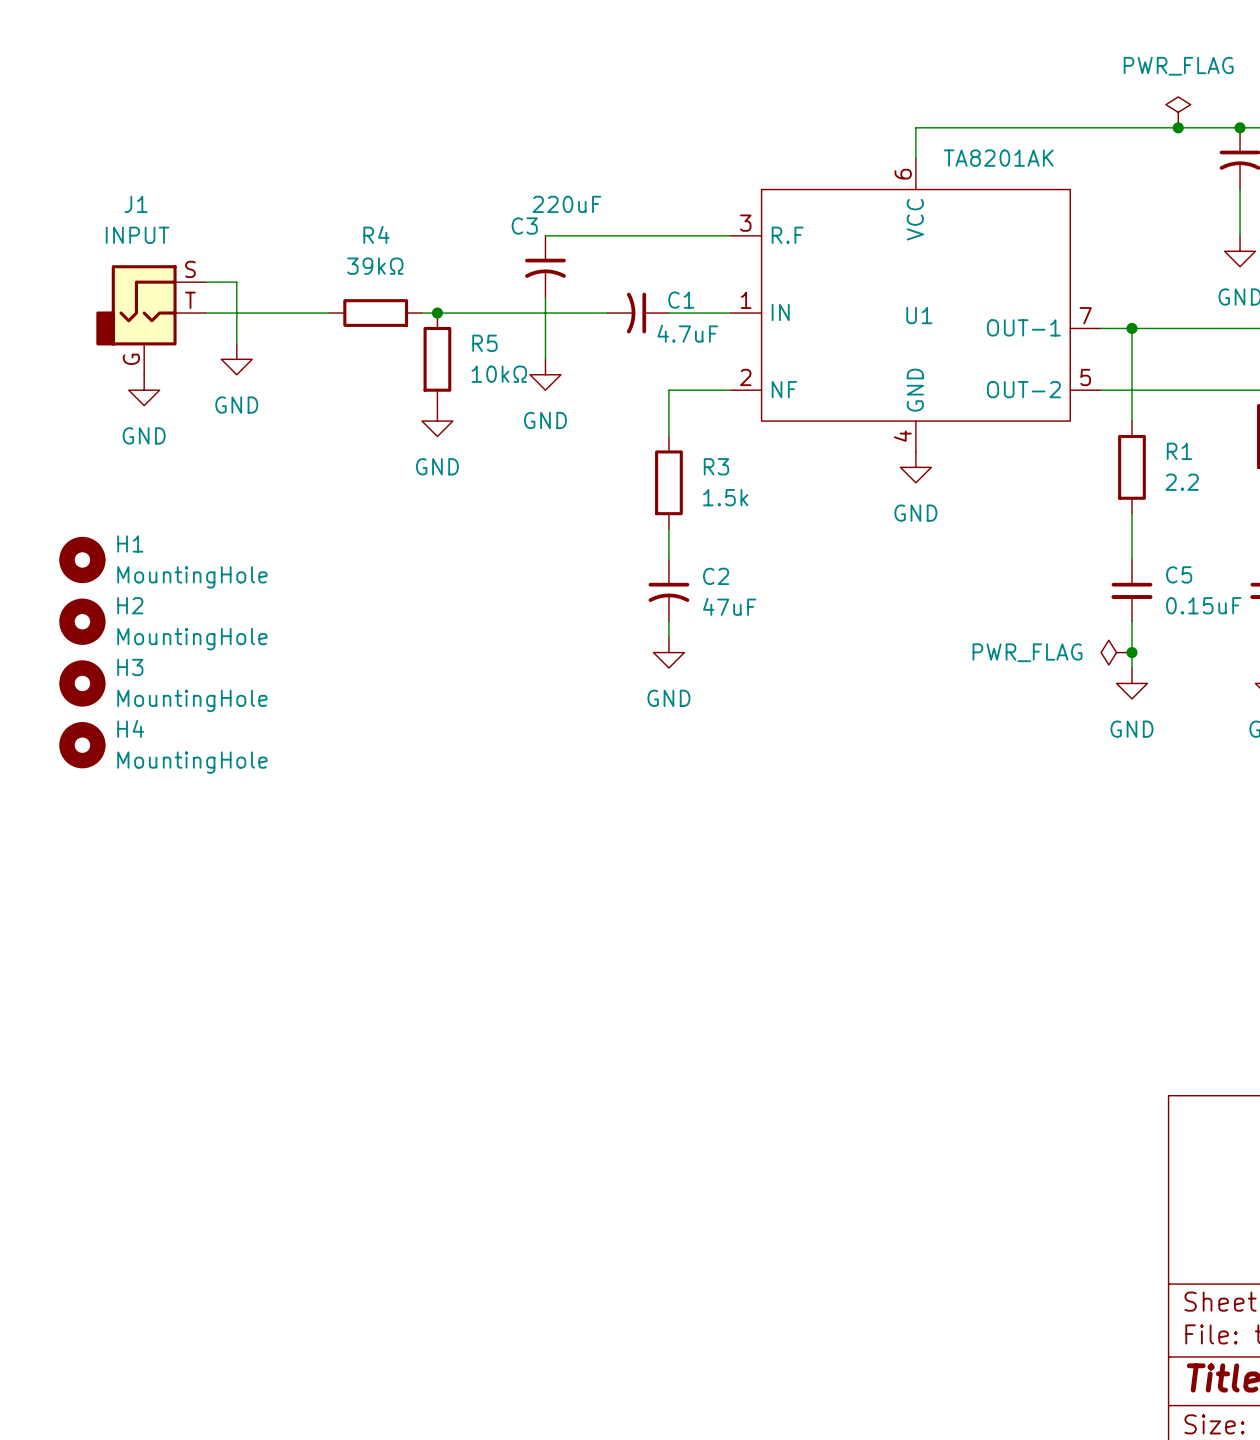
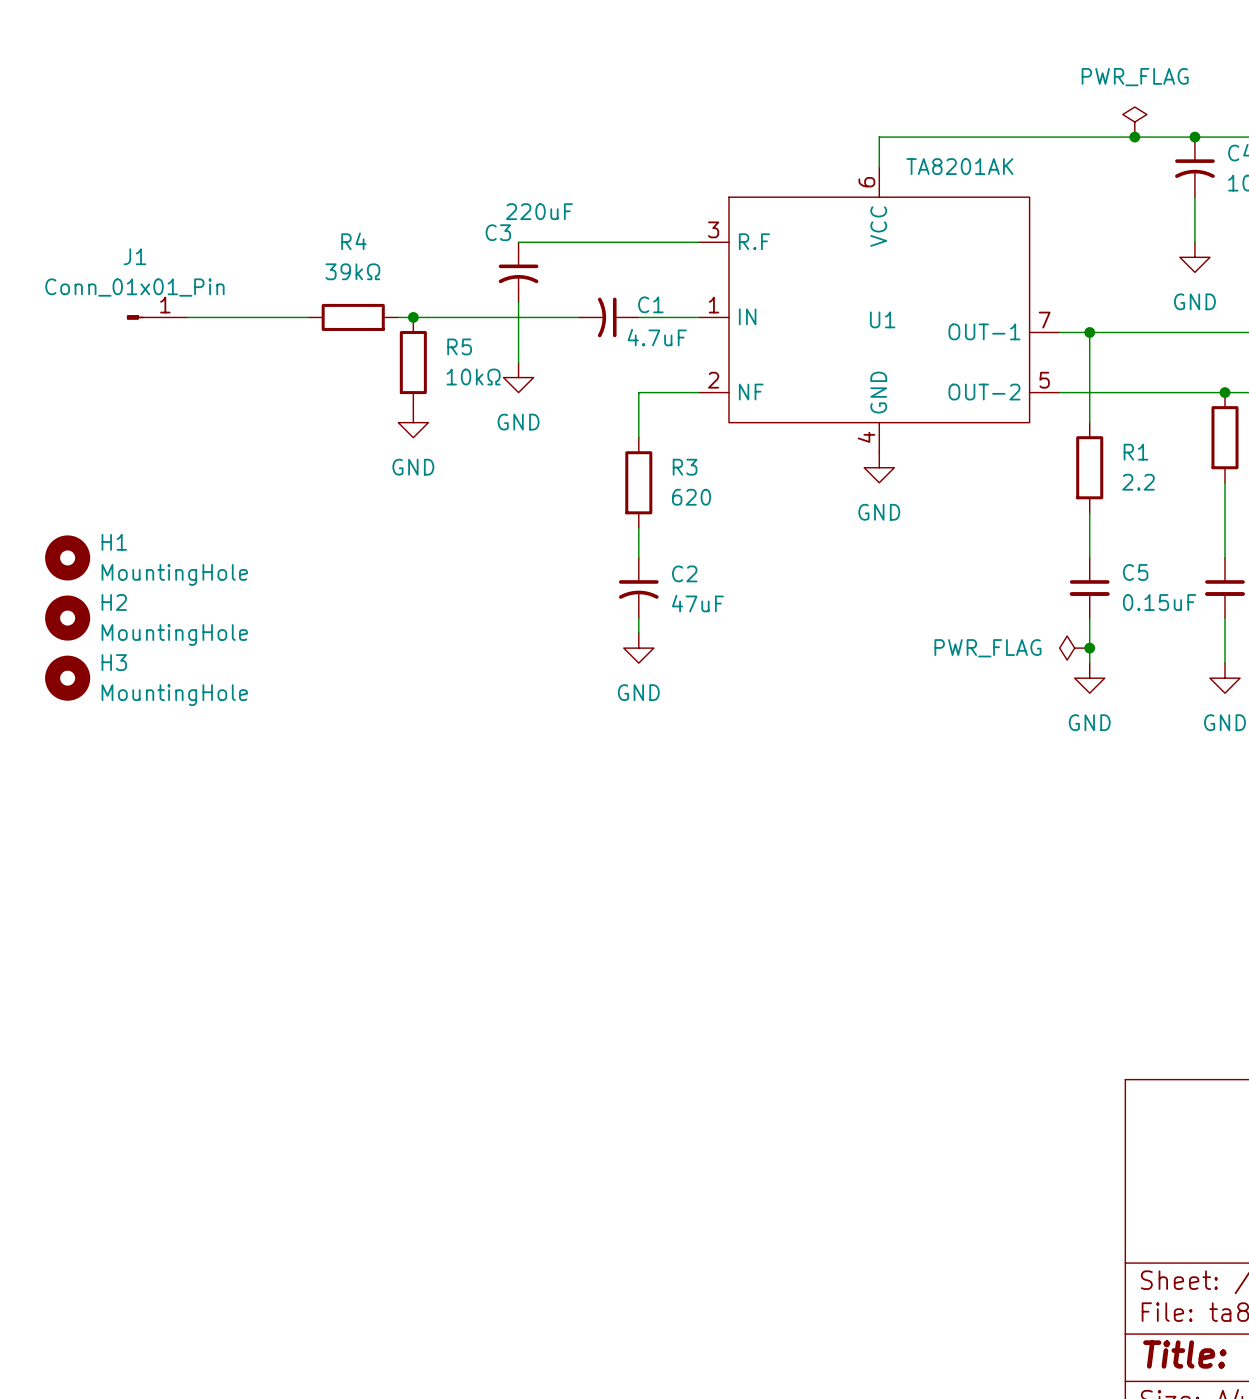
J1 name position: J1 (136, 204) -> J1 (134, 256)
J1 value: INPUT (137, 235) -> Conn_01x01_Pin (134, 287)
J1 symbol: [96, 265, 206, 375] -> [126, 315, 188, 320]
wire: (205, 282) (236, 282) (236, 343) -> none
power symbol: GND (236, 359) -> none
power symbol: GND (144, 390) -> none
R3 value: 1.5k (725, 497) -> 620 (691, 497)
H4: MountingHole (82, 745) -> none

